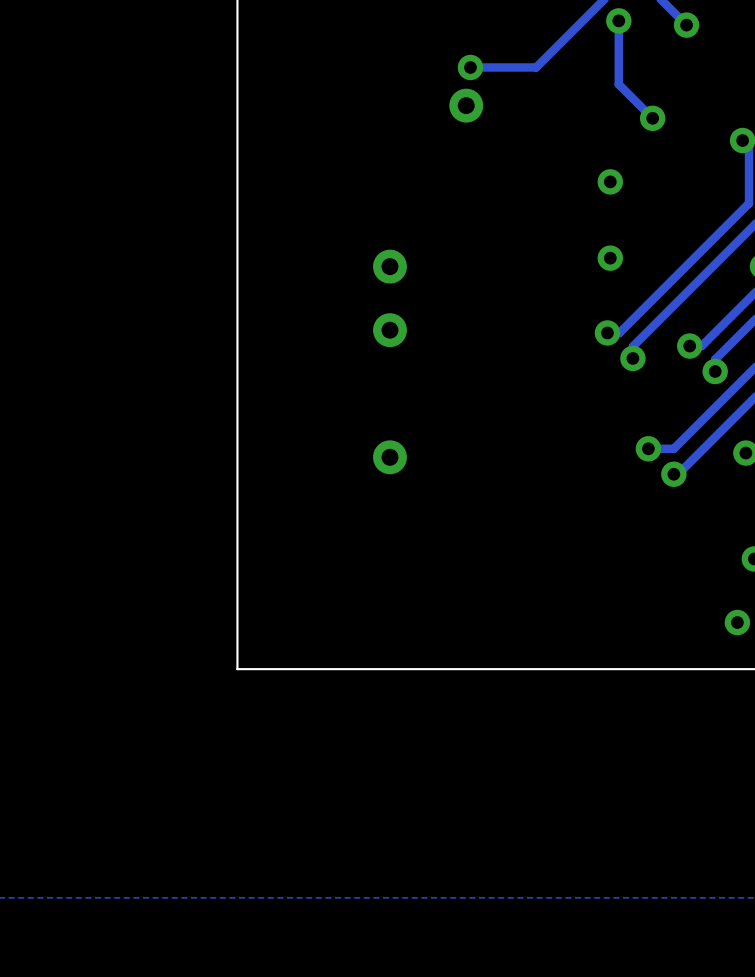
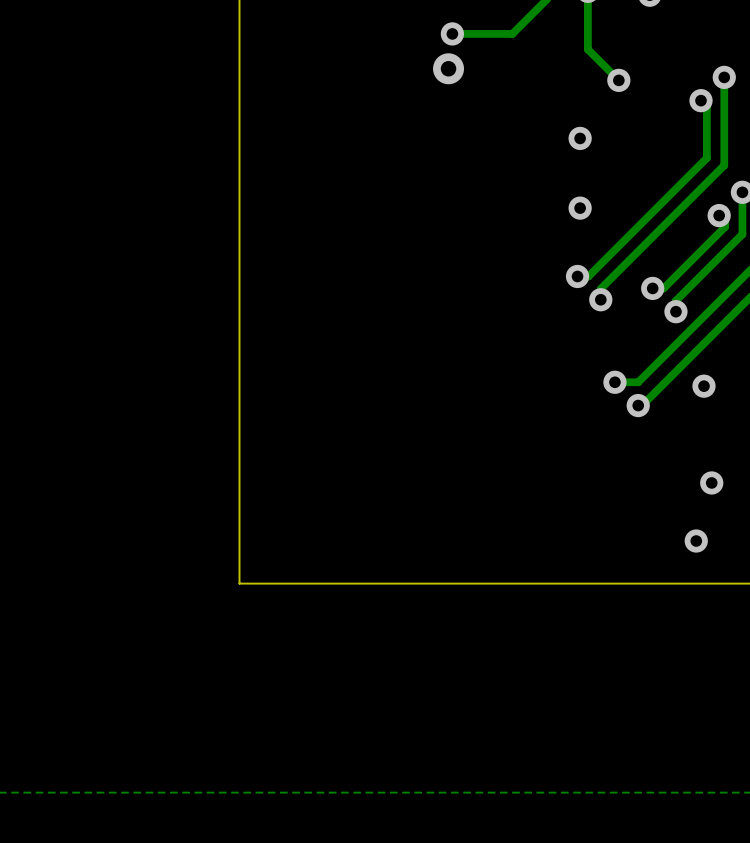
via: (389, 266) -> none
via: (389, 330) -> none
via: (389, 457) -> none

